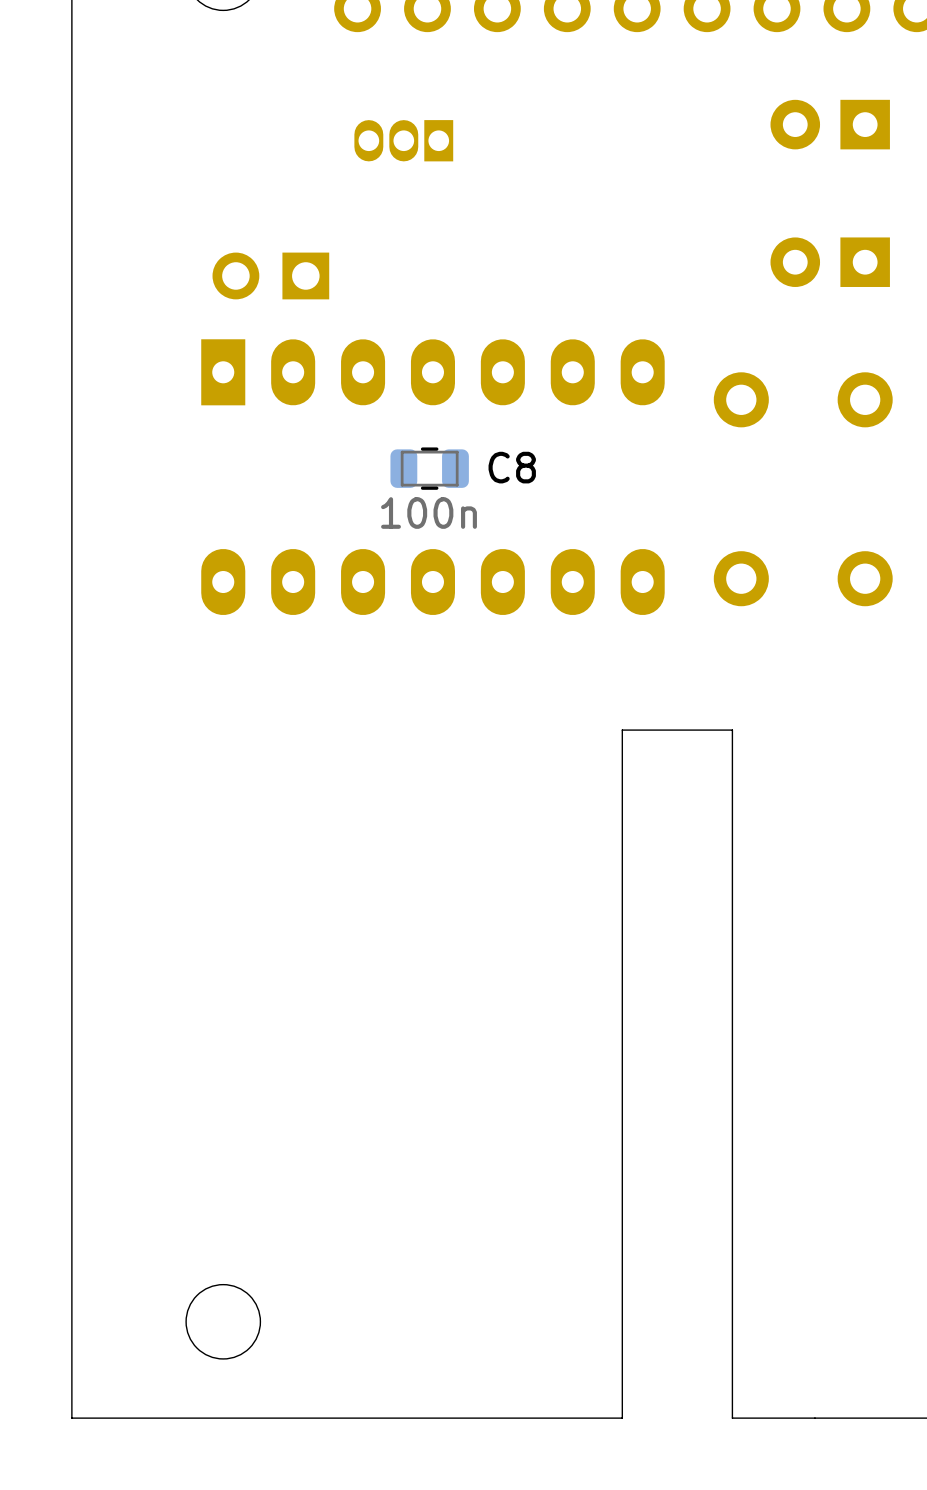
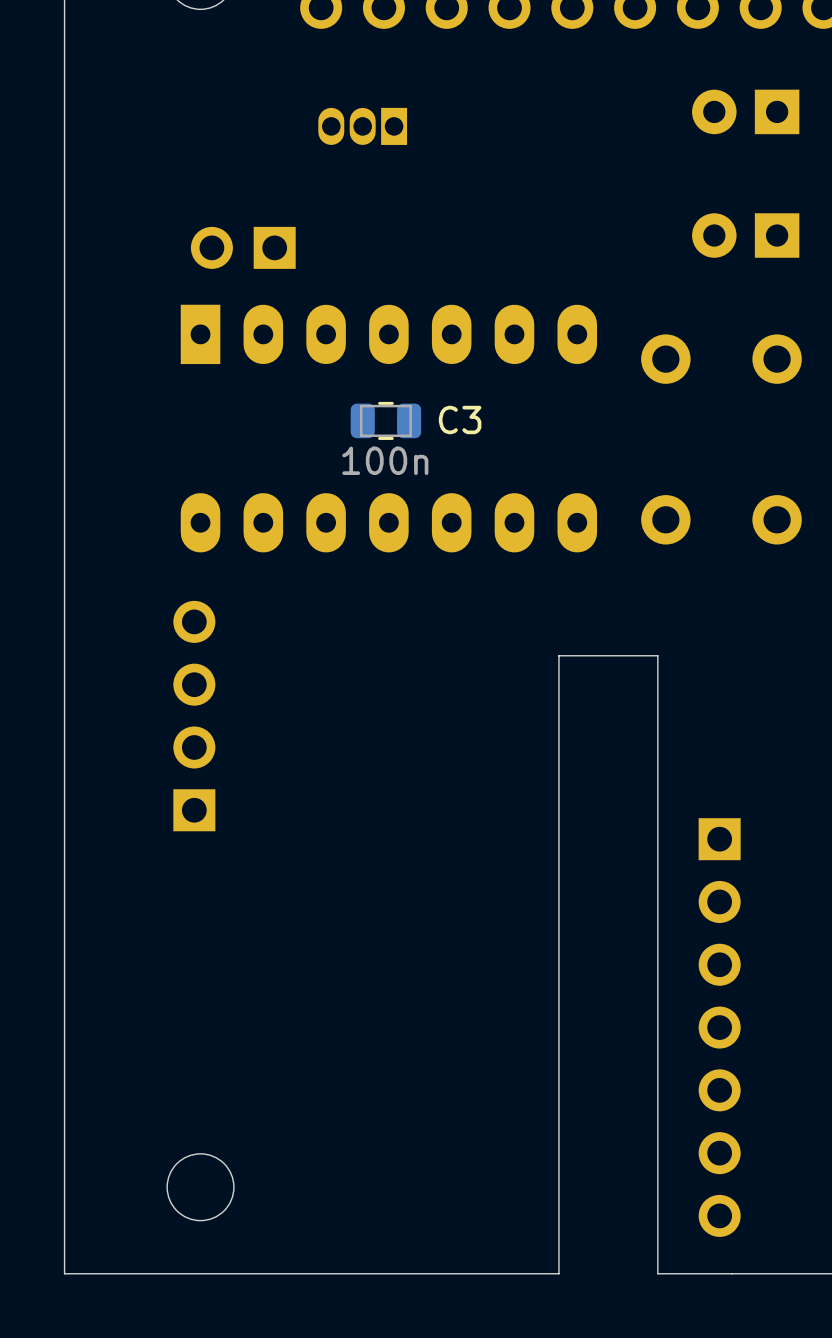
C8 name: C8 (512, 467) -> C3 (460, 420)
part: none -> (194, 716)
part: none -> (719, 1027)

